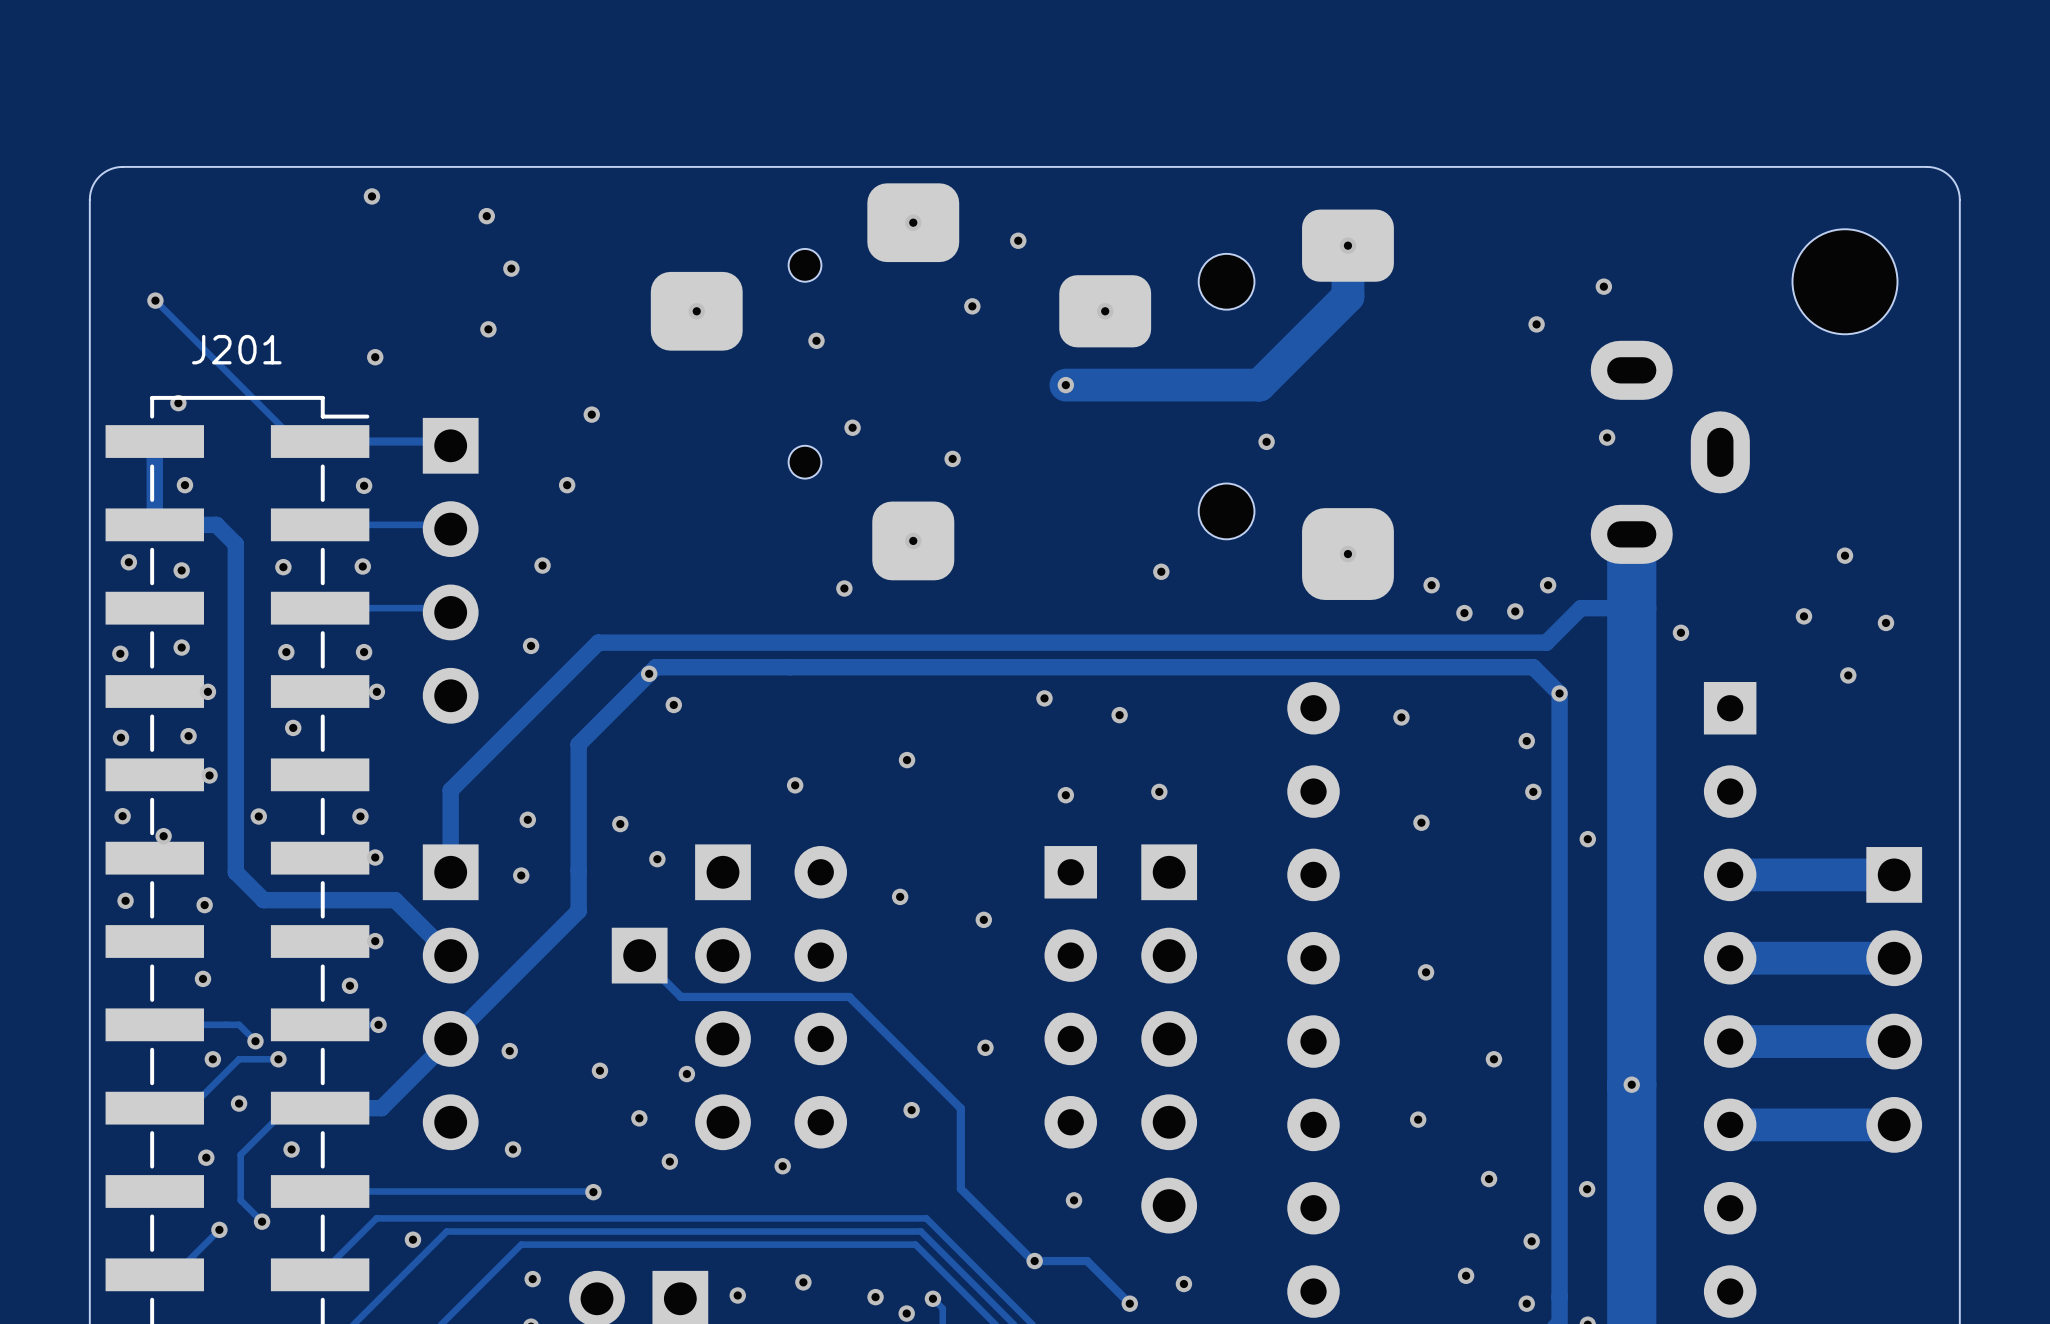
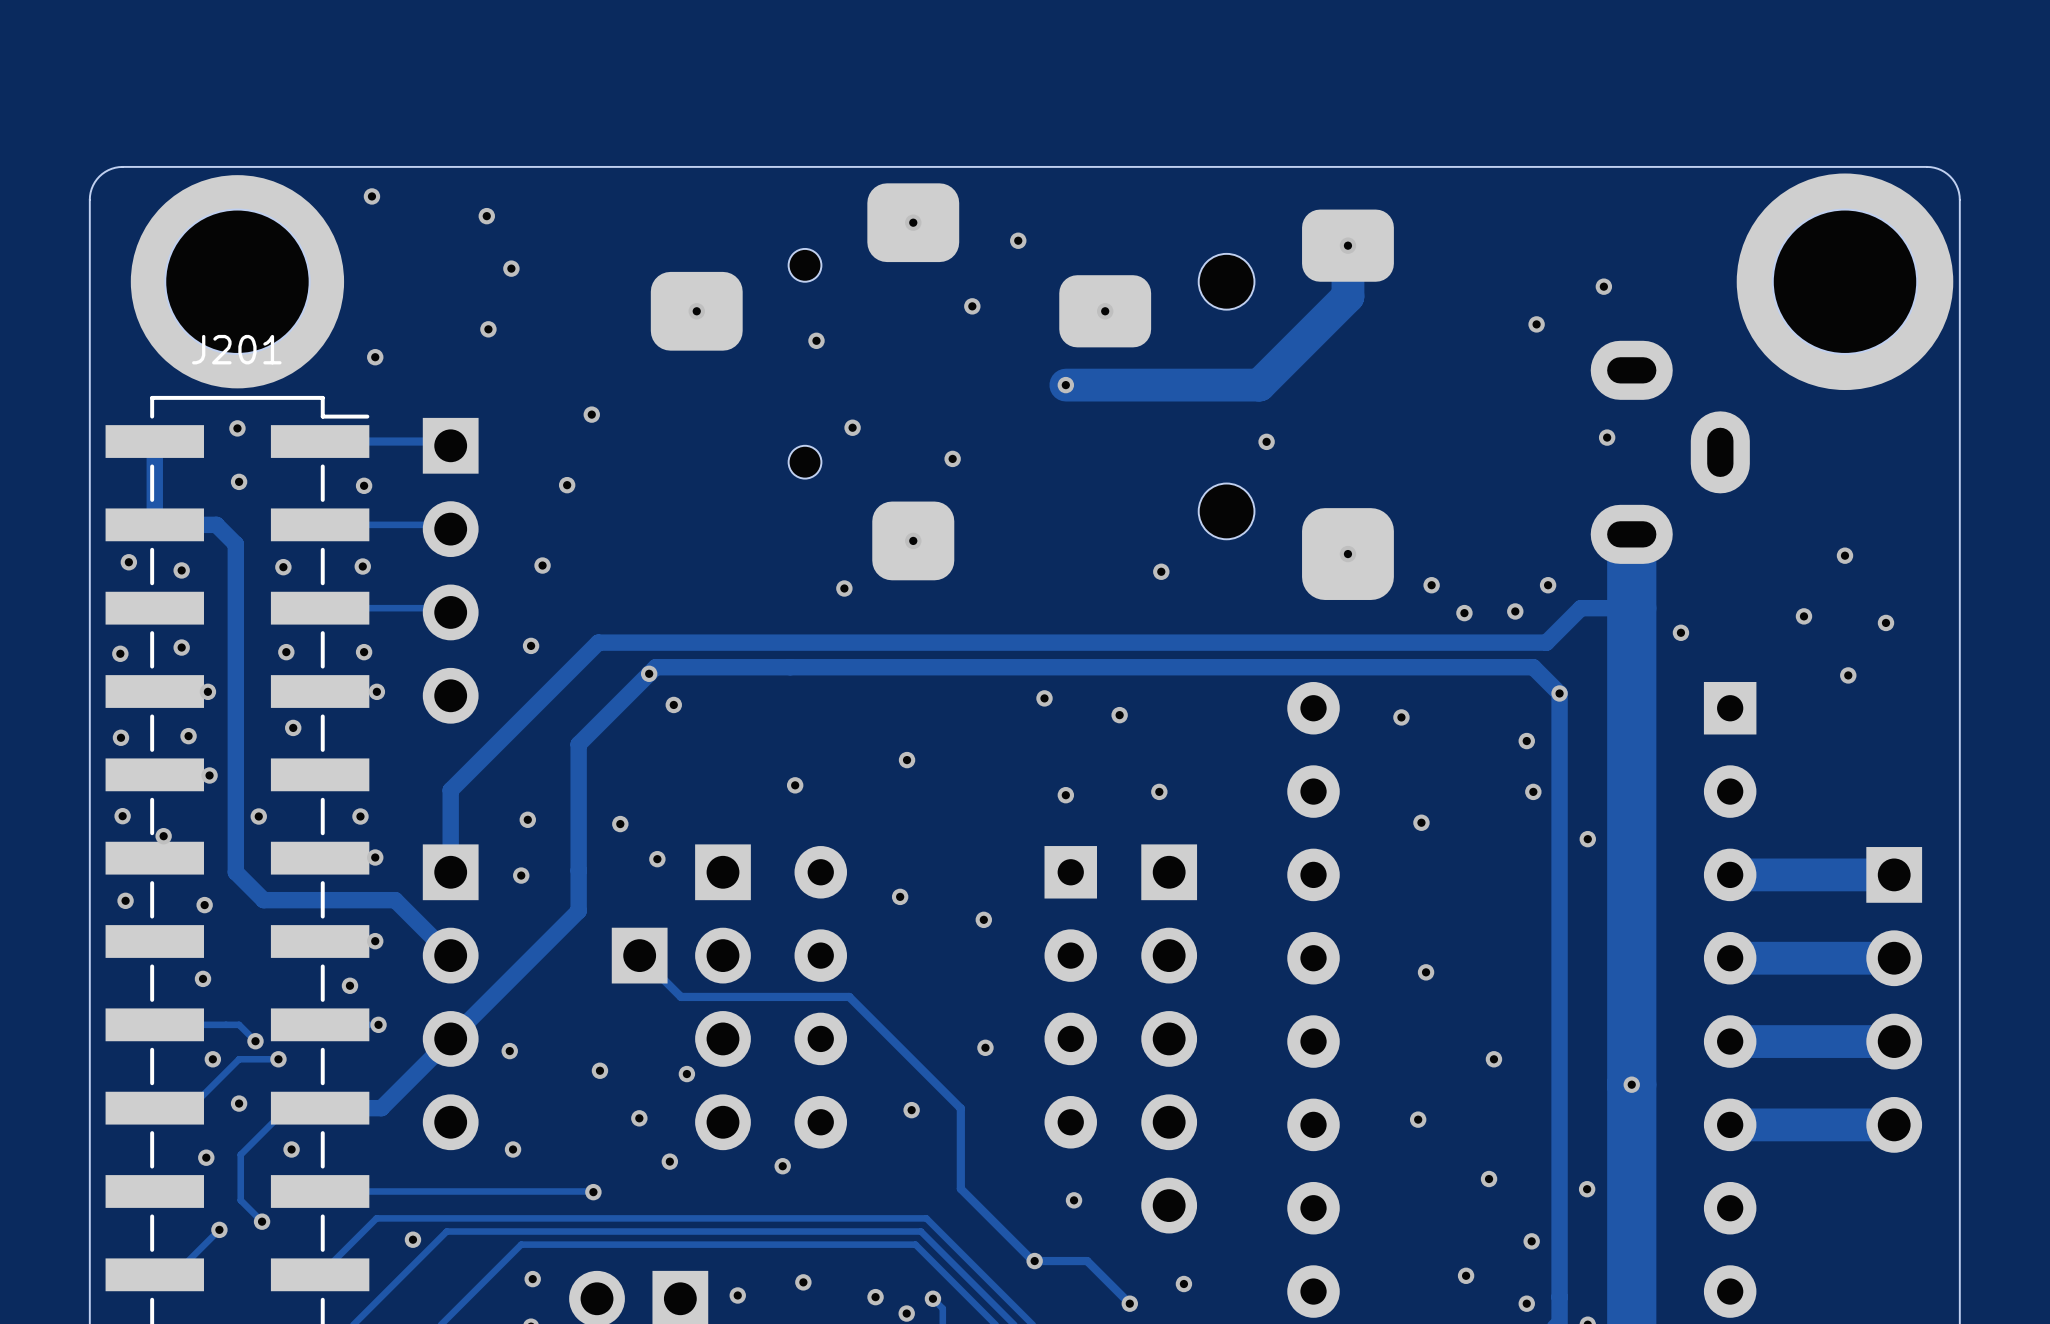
part footprint: [1792, 229, 1898, 335] -> [1736, 173, 1954, 391]
part: none -> (237, 281)
track: (155, 300) (296, 441) (320, 441) -> none
via: (155, 300) -> none
via: (178, 403) -> none
via: none -> (237, 428)
via: none -> (239, 481)
via: (184, 485) -> none

